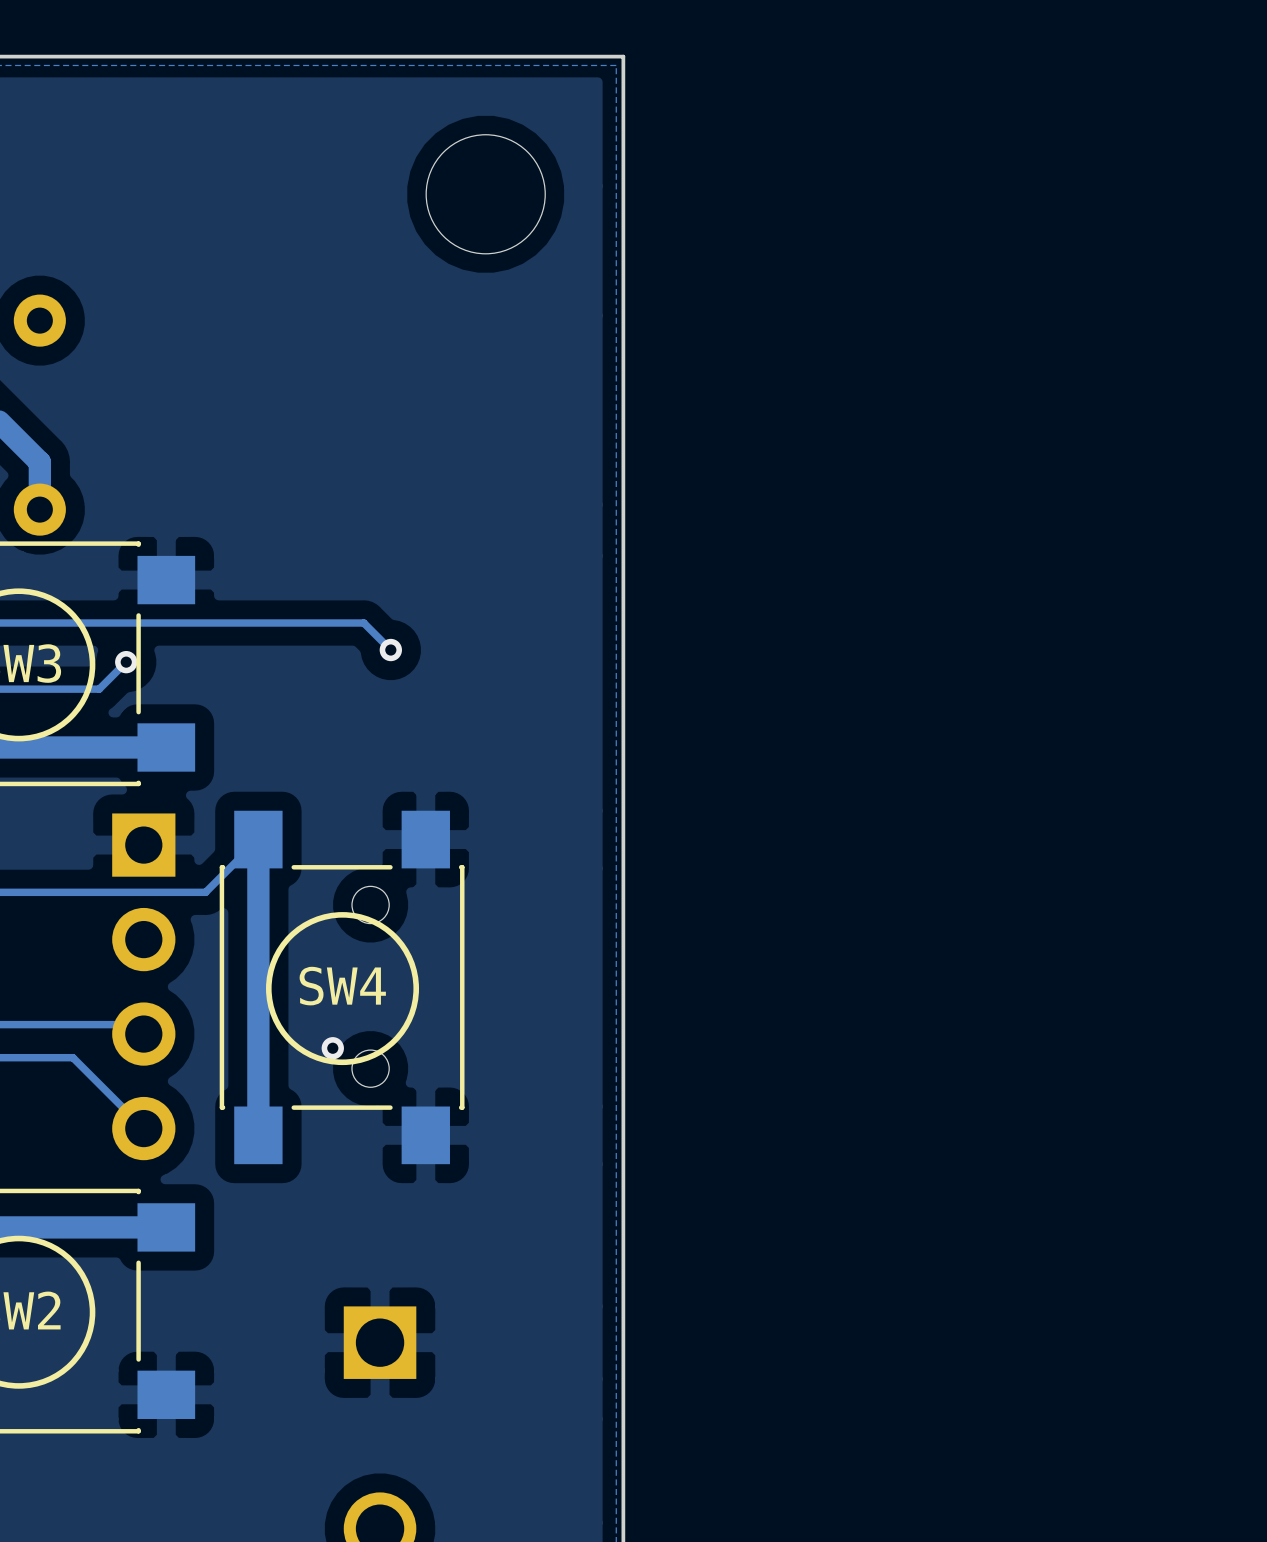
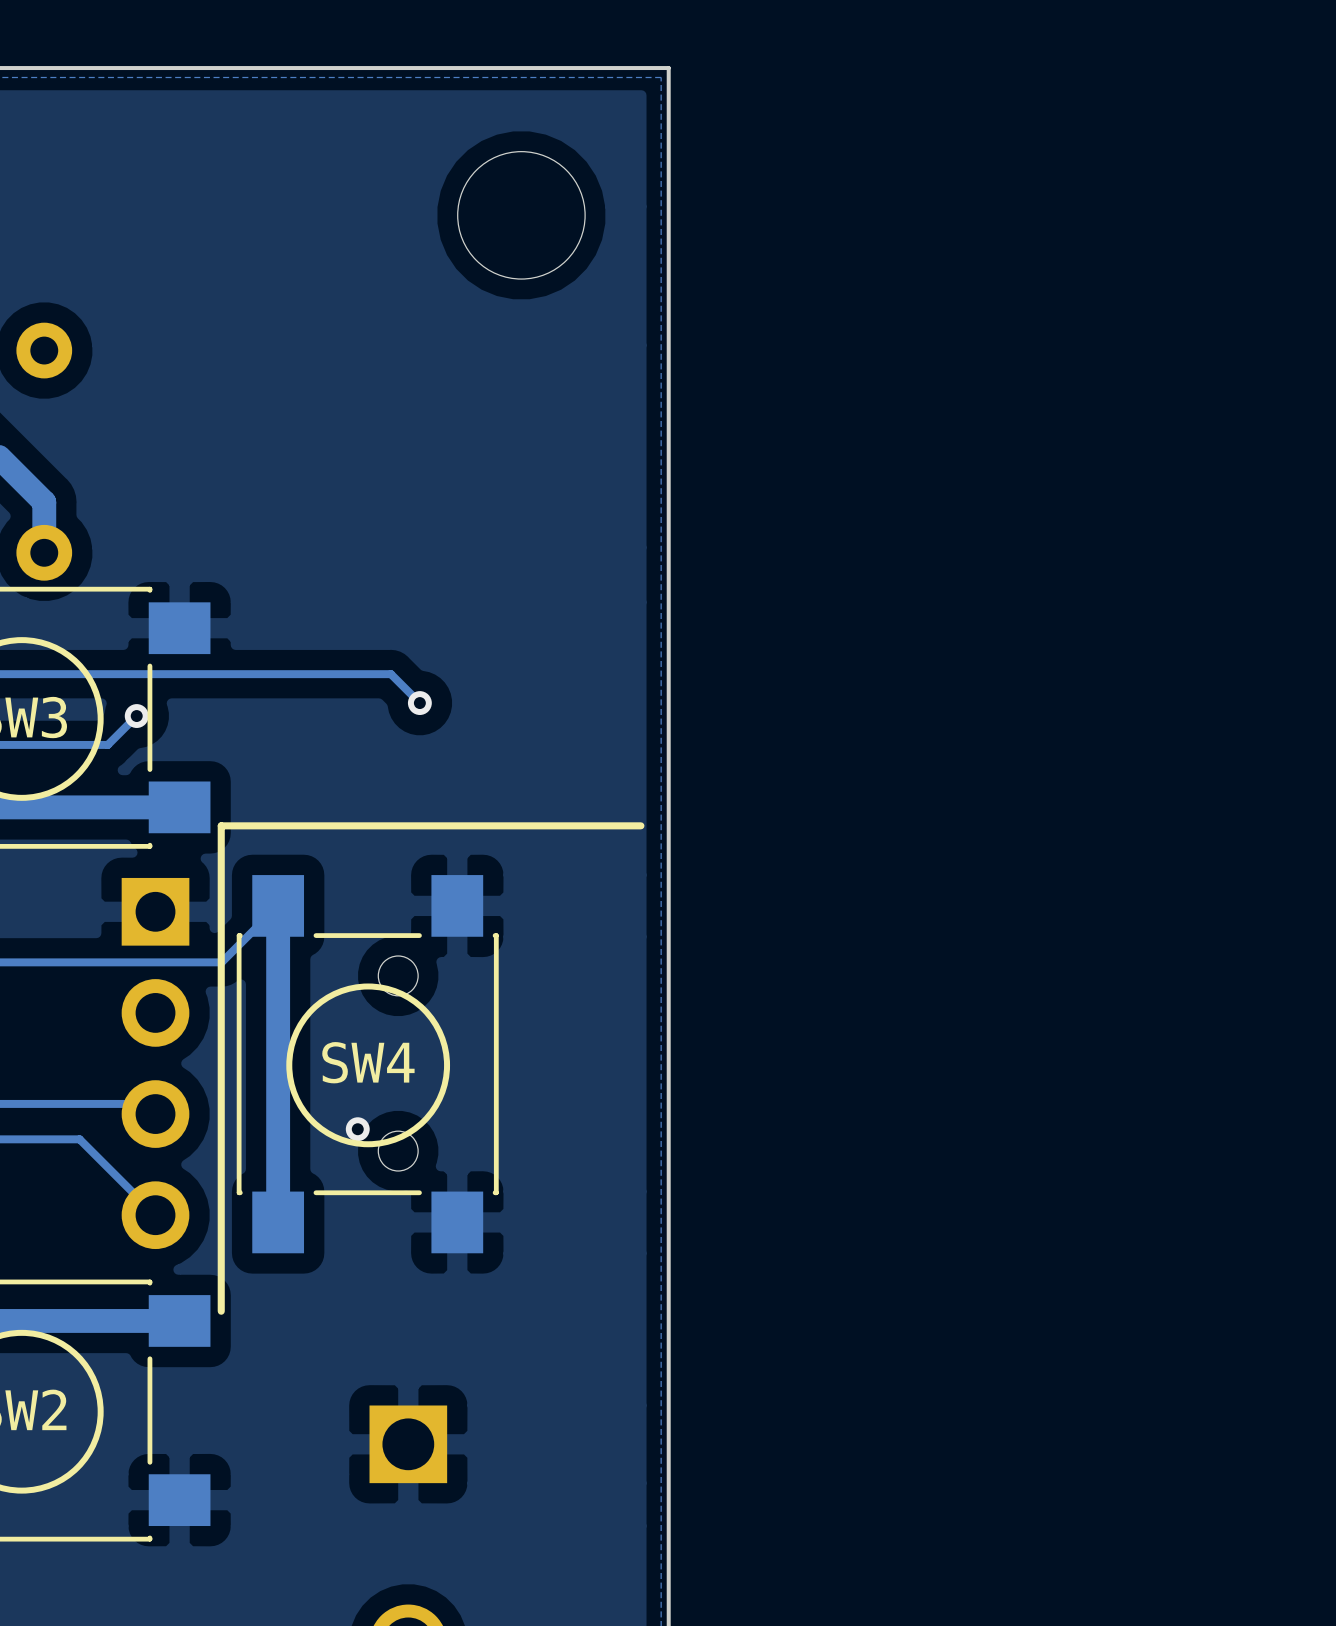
line: none -> (640, 825) (221, 825) (221, 1311)

